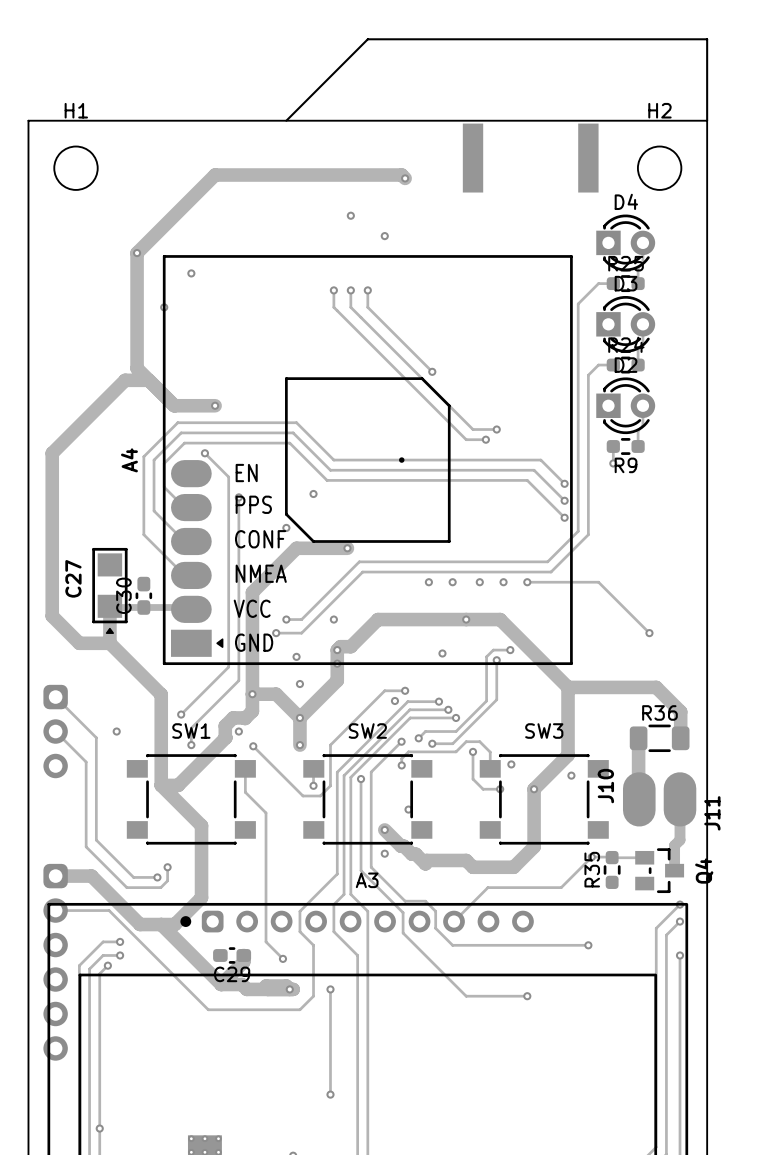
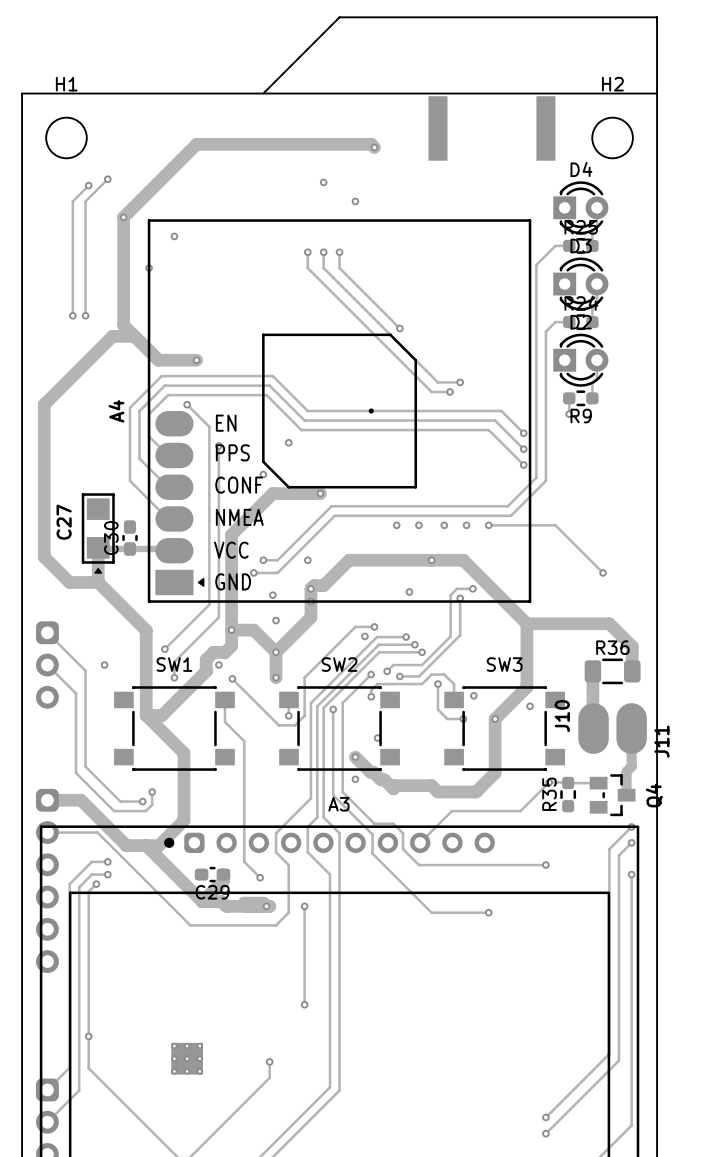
track: none -> (107, 179) (85, 201) (85, 315)
via: none -> (107, 179)
track: none -> (88, 185) (72, 201) (72, 315)
via: none -> (88, 185)
via: none -> (72, 315)
via: none -> (85, 315)

